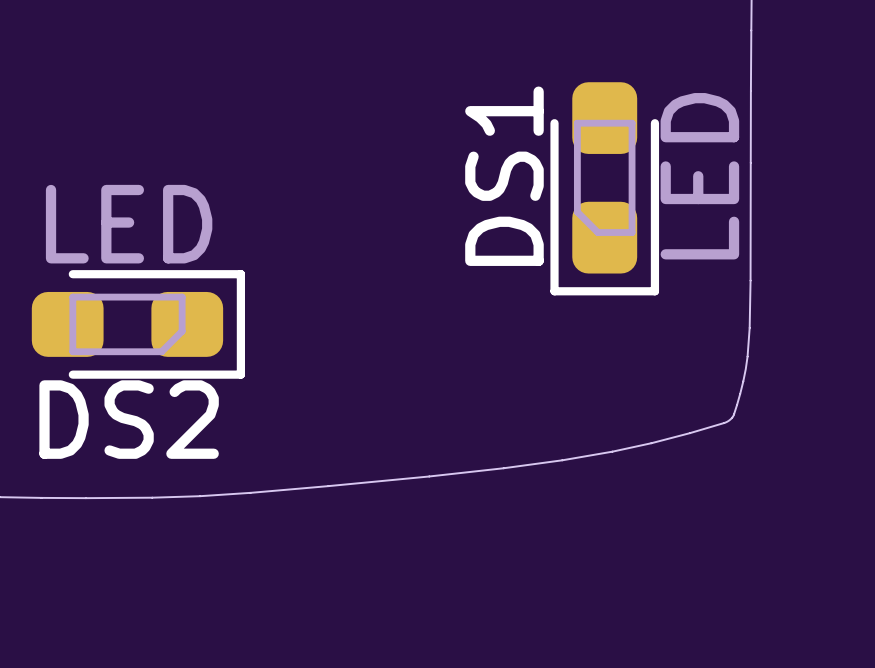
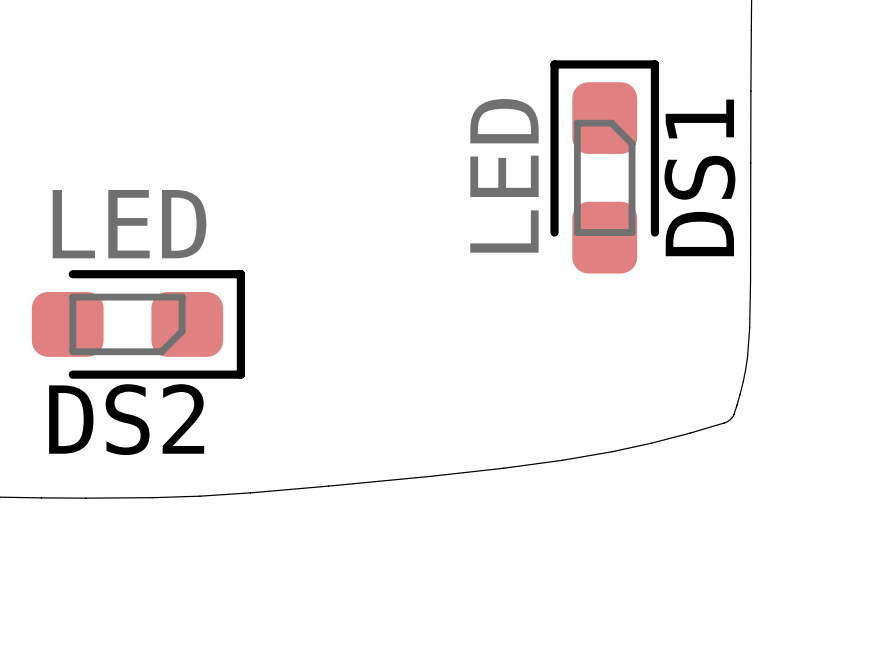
DS1 rotation: 0° (604, 188) -> 180° (604, 166)

